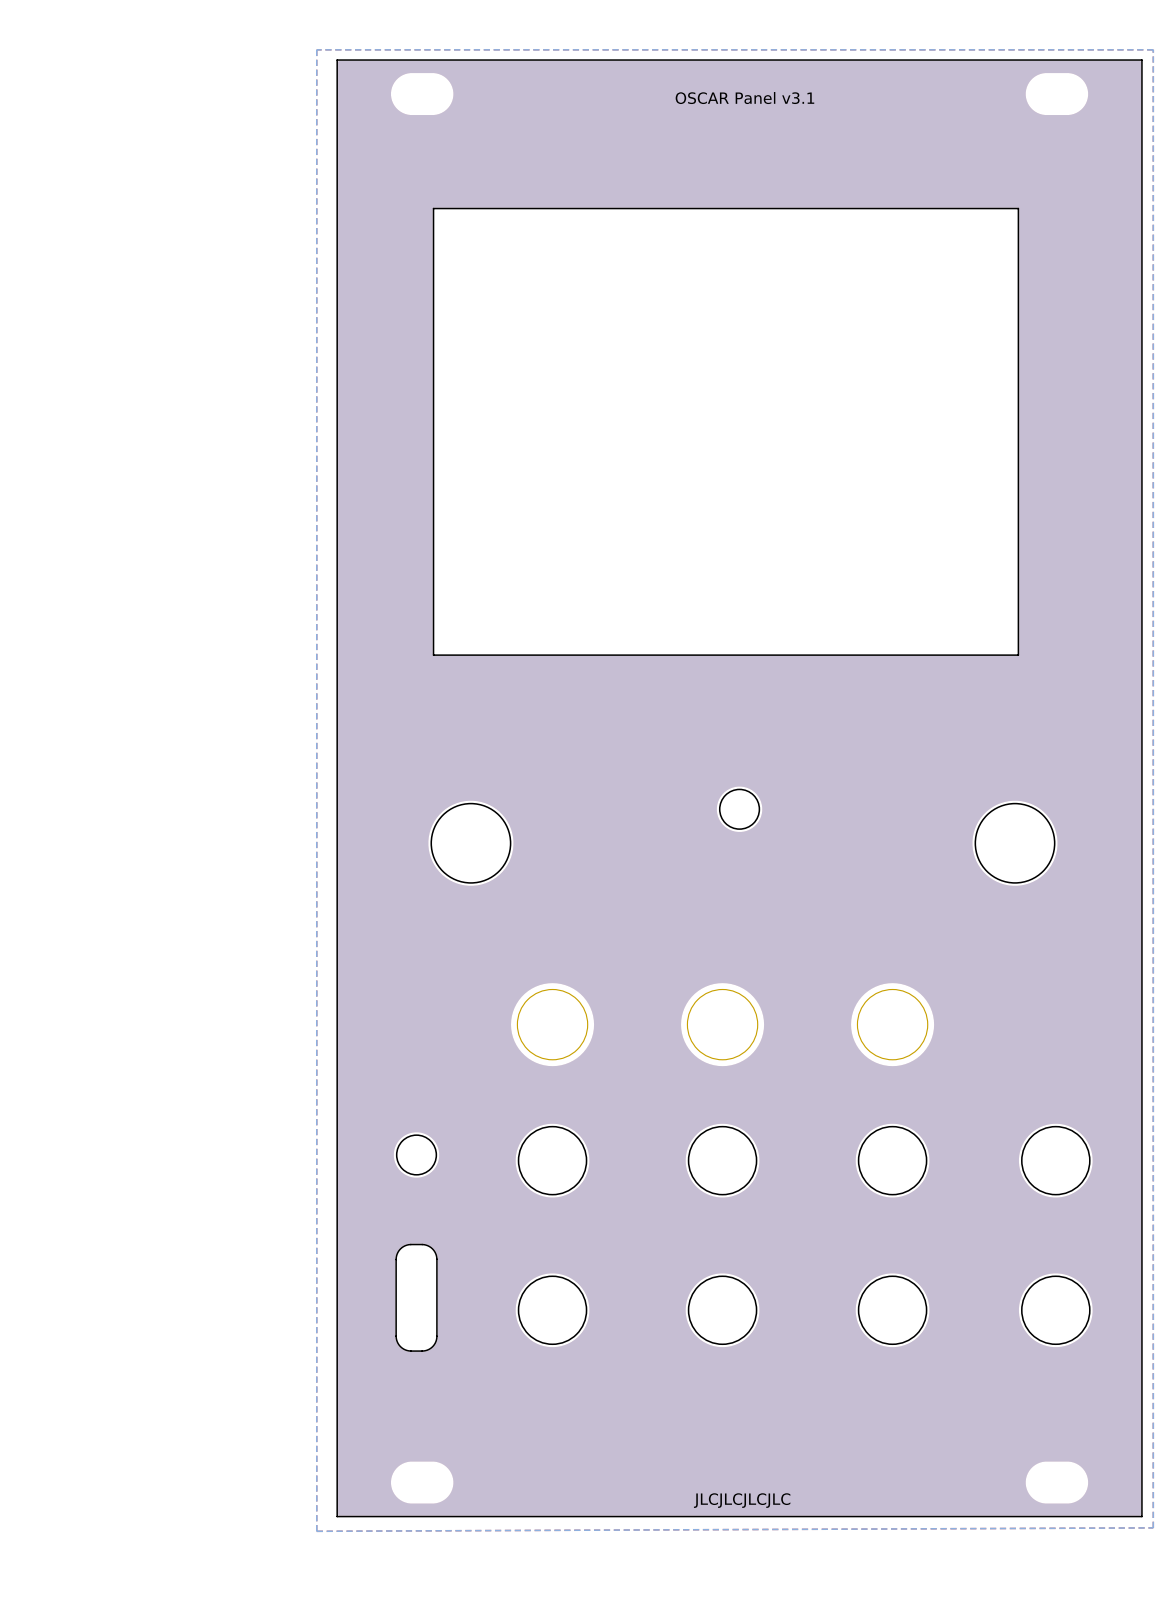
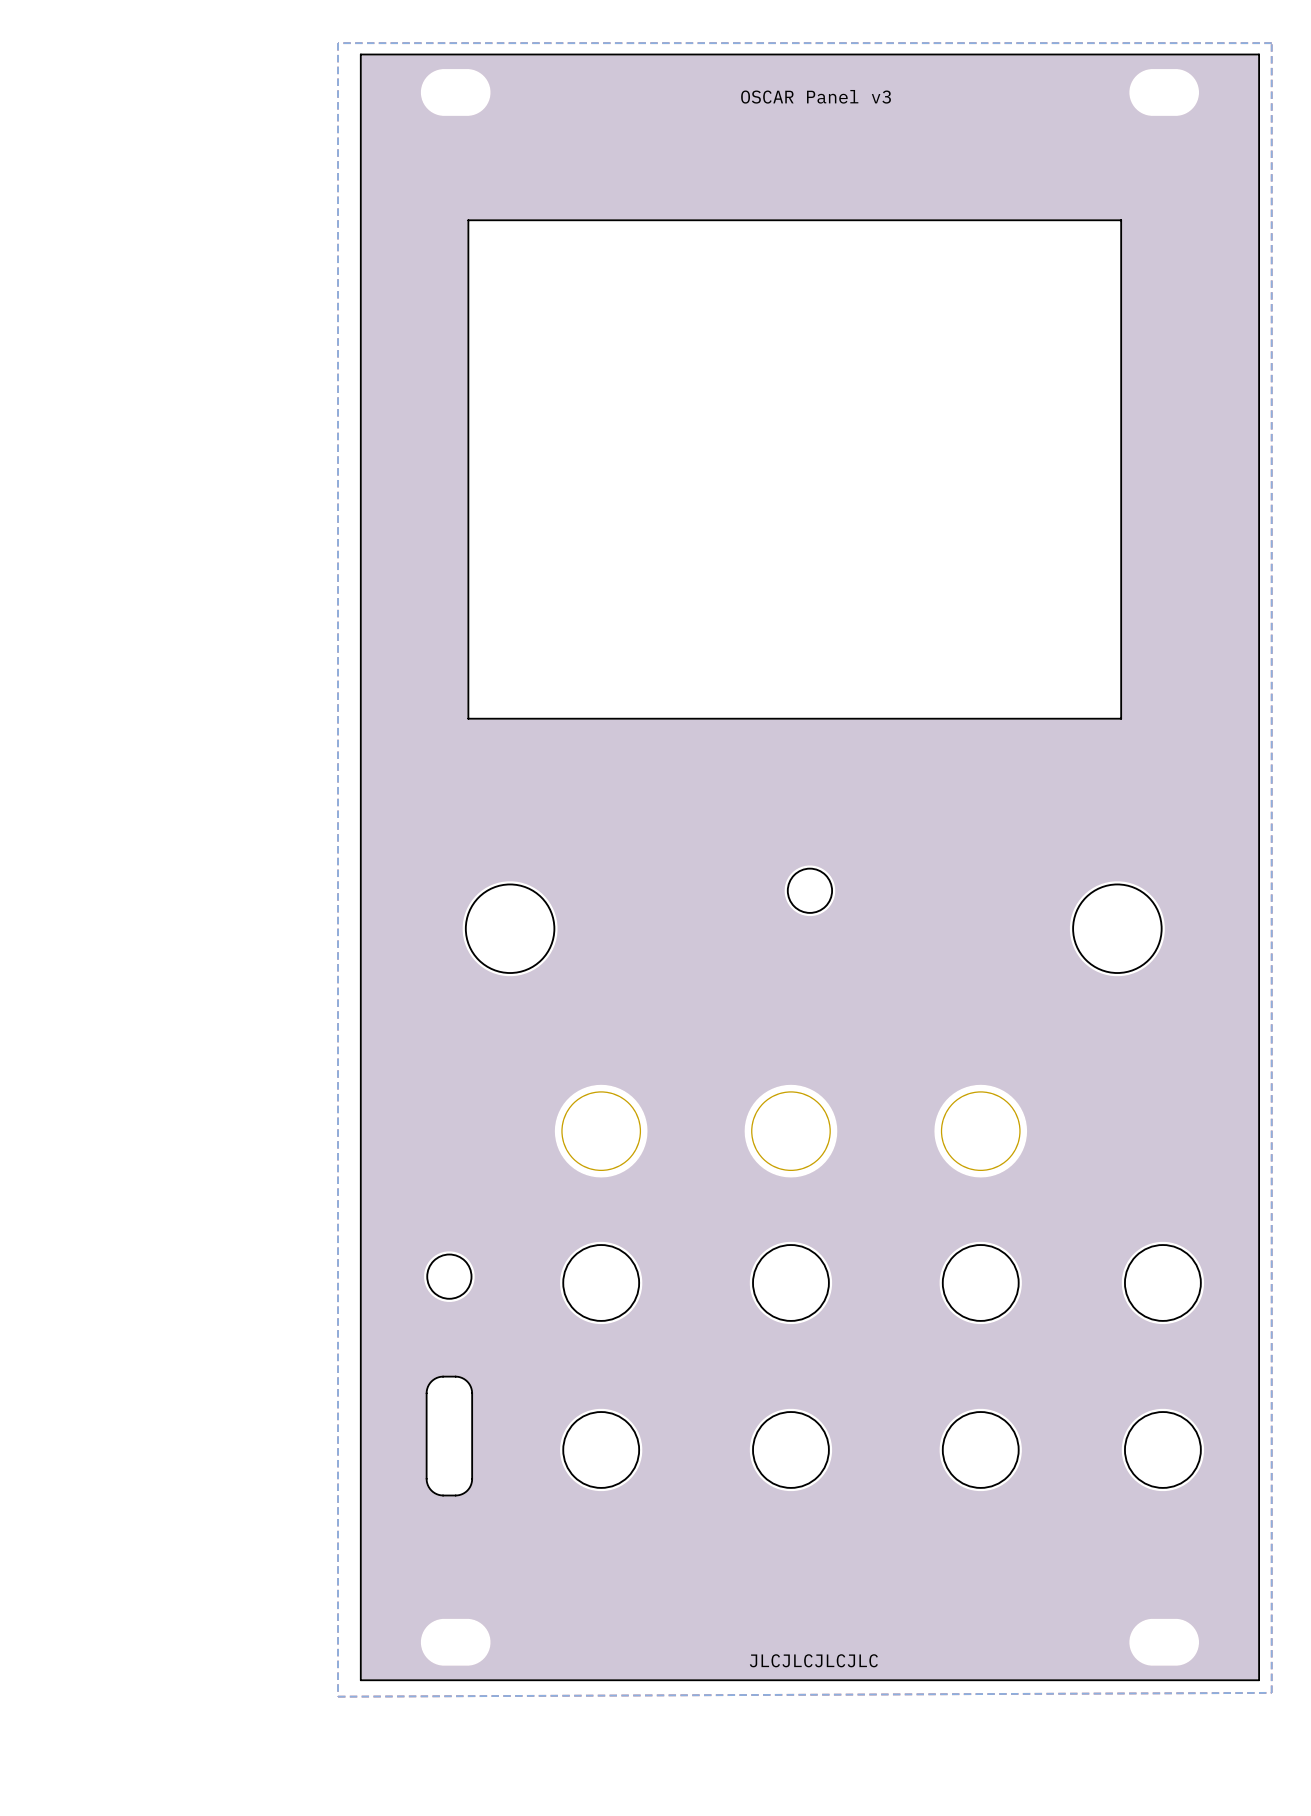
text: OSCAR Panel v3.1 (744, 98) -> OSCAR Panel v3 (816, 96)

